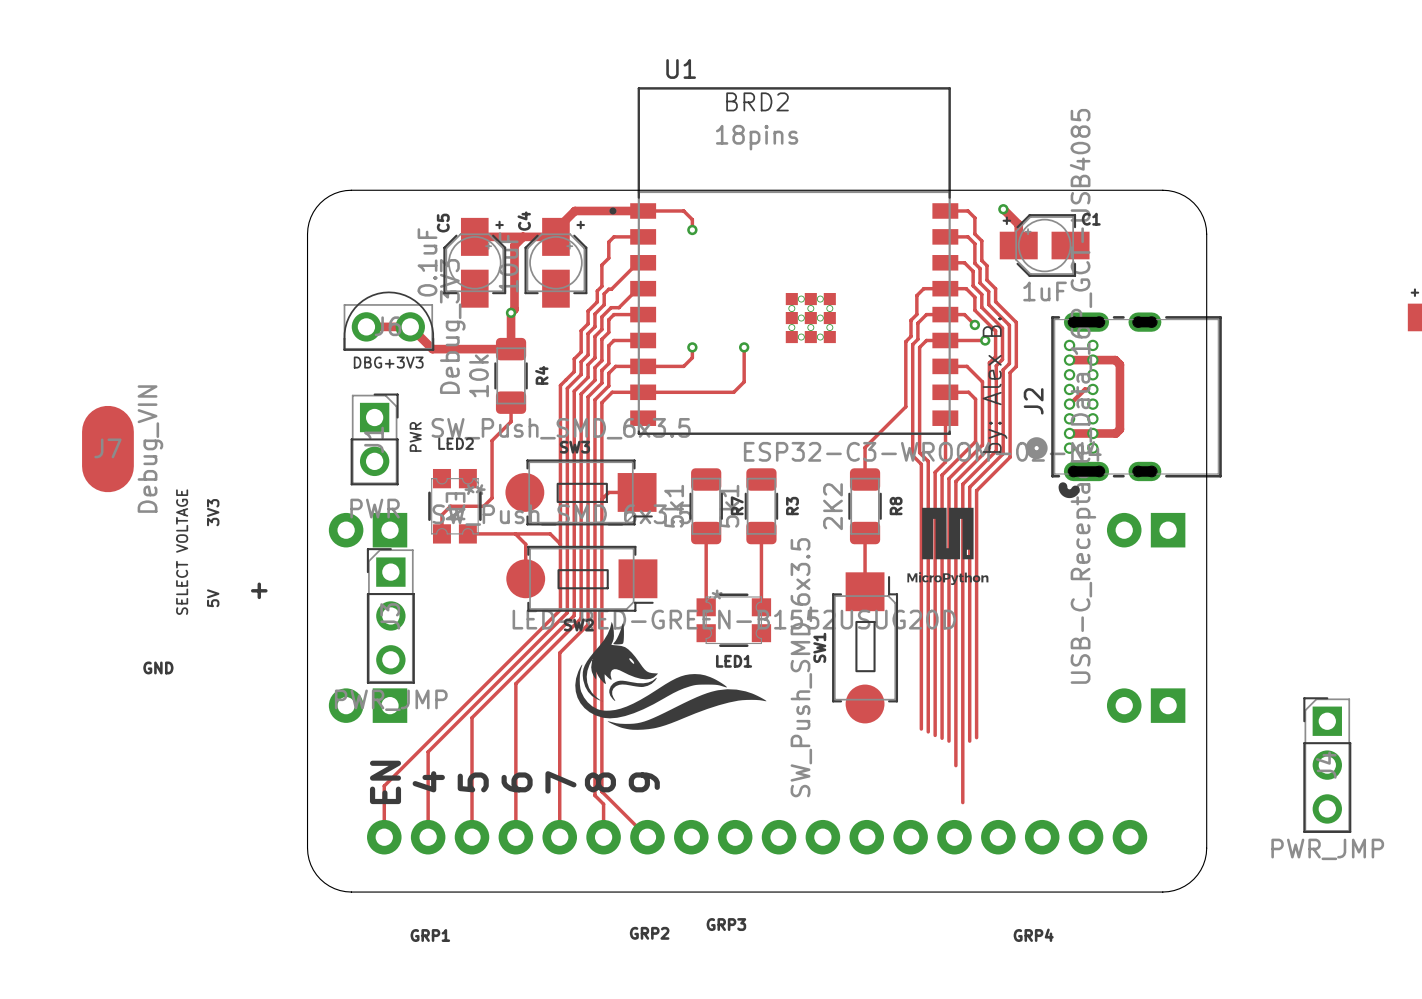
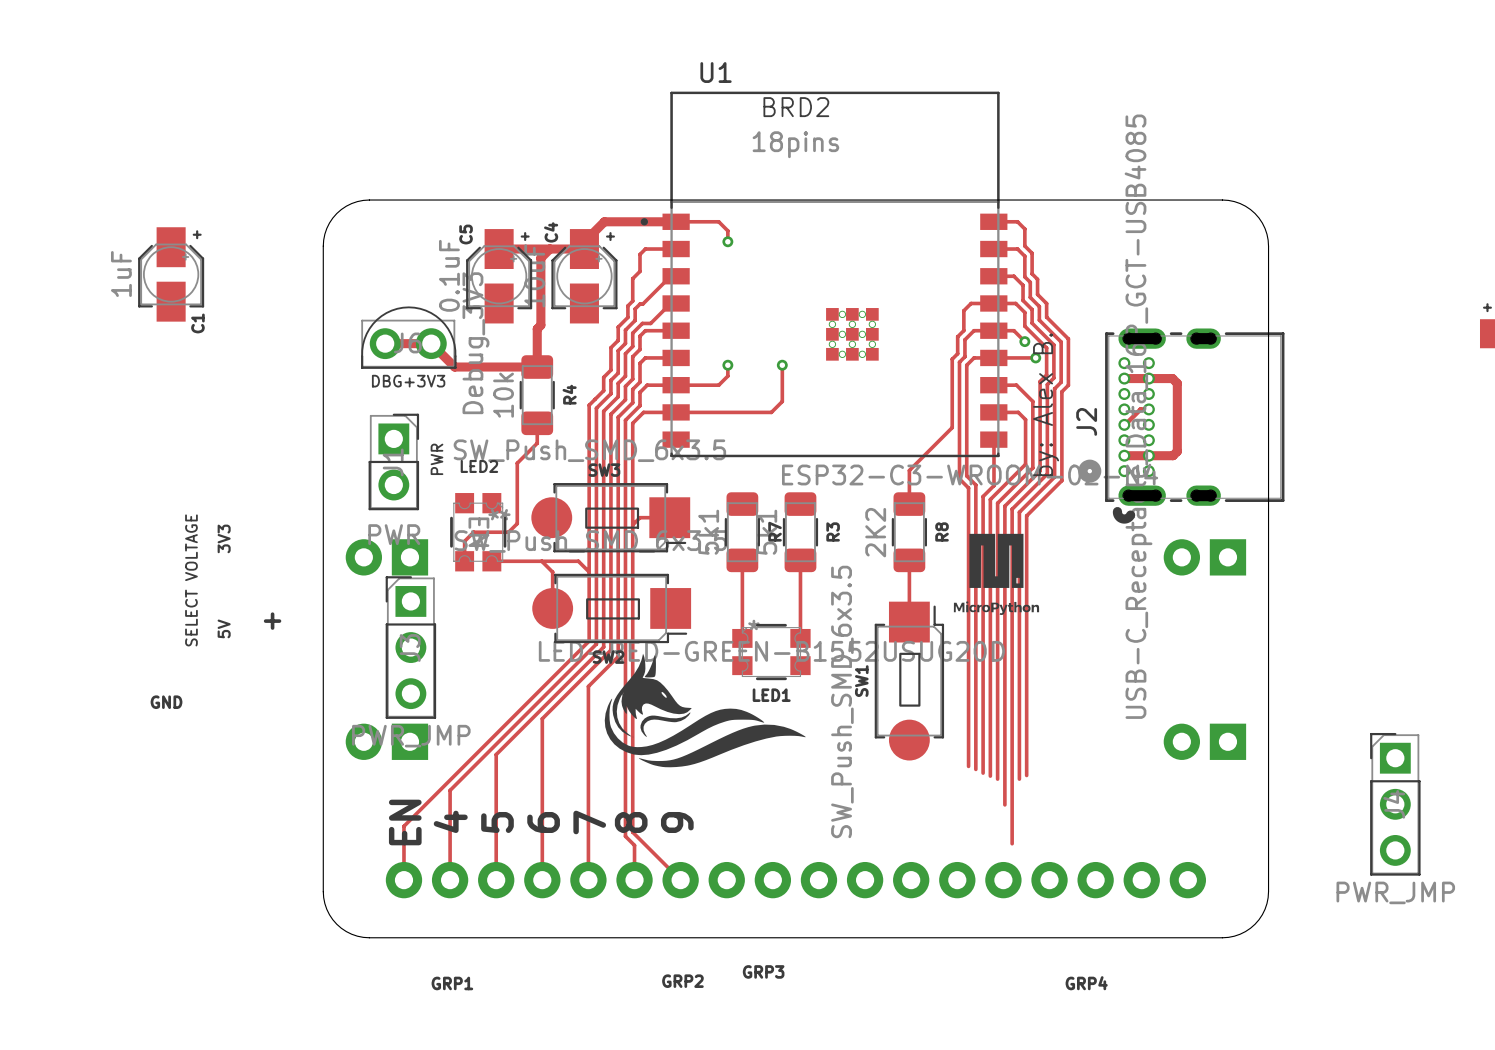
track: (1003, 209) (1018, 224) (1018, 245) -> none
via: (1003, 209) -> none
C1 rotation: 0° (1044, 245) -> 90° clockwise (171, 274)
C1 position: (1044, 245) -> (171, 274)
via: (511, 312) -> none
part: Debug_VIN (107, 449) -> none

